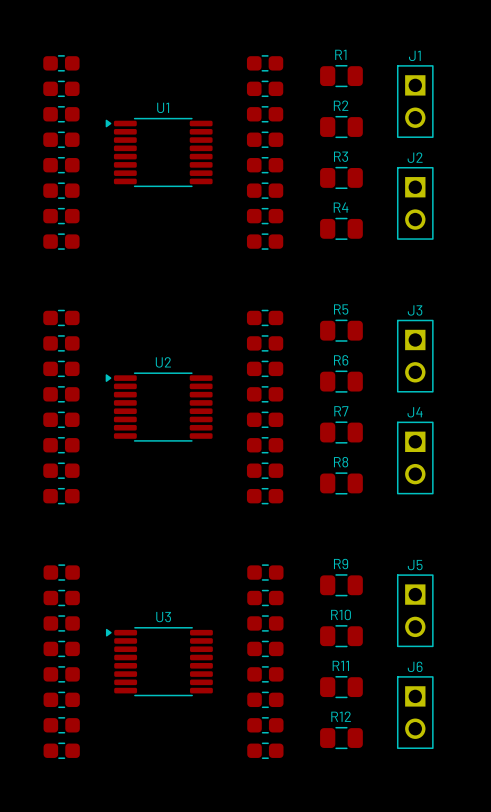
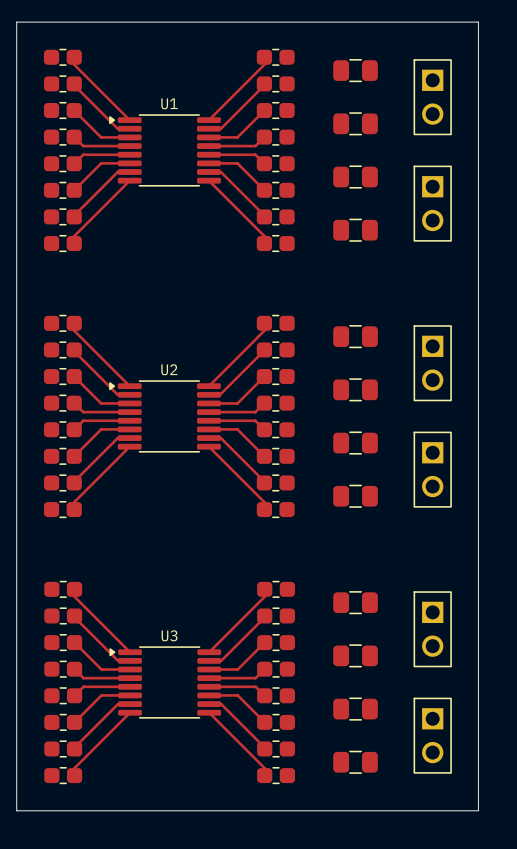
board edge: none -> (16, 22) (478, 22) (478, 810) (16, 810) (16, 22)
R1 name: R1 (340, 54) -> none
J1 name: J1 (414, 55) -> none
top track: none -> (74, 57) (74, 64) (129, 120)
top track: none -> (264, 57) (264, 64) (208, 120)
top track: none -> (74, 83) (117, 128) (129, 128)
top track: none -> (264, 83) (220, 128) (208, 128)
R2 name: R2 (341, 105) -> none
top track: none -> (74, 110) (101, 137) (129, 137)
top track: none -> (264, 110) (237, 137) (208, 137)
top track: none -> (74, 137) (83, 146) (129, 146)
top track: none -> (264, 137) (255, 146) (208, 146)
top track: none -> (129, 154) (83, 154) (74, 163)
top track: none -> (208, 154) (255, 154) (264, 163)
R3 name: R3 (341, 156) -> none
J2 name: J2 (415, 157) -> none
top track: none -> (129, 163) (101, 163) (74, 190)
top track: none -> (208, 163) (237, 163) (264, 190)
top track: none -> (129, 172) (117, 172) (74, 216)
top track: none -> (208, 172) (220, 172) (264, 216)
top track: none -> (129, 180) (74, 236) (74, 243)
top track: none -> (208, 180) (264, 236) (264, 243)
R4 name: R4 (341, 207) -> none
R5 name: R5 (341, 309) -> none
J3 name: J3 (415, 310) -> none
top track: none -> (74, 323) (74, 330) (129, 386)
top track: none -> (264, 323) (264, 330) (208, 386)
top track: none -> (74, 349) (117, 394) (129, 394)
top track: none -> (264, 349) (220, 394) (208, 394)
R6 name: R6 (341, 360) -> none
top track: none -> (74, 376) (101, 403) (129, 403)
top track: none -> (264, 376) (237, 403) (208, 403)
top track: none -> (74, 403) (83, 412) (129, 412)
top track: none -> (264, 403) (255, 412) (208, 412)
top track: none -> (129, 420) (83, 420) (74, 429)
top track: none -> (208, 420) (255, 420) (264, 429)
R7 name: R7 (341, 411) -> none
J4 name: J4 (415, 412) -> none
top track: none -> (129, 429) (101, 429) (74, 456)
top track: none -> (208, 429) (237, 429) (264, 456)
top track: none -> (129, 438) (117, 438) (74, 482)
top track: none -> (208, 438) (220, 438) (264, 482)
top track: none -> (129, 446) (74, 502) (74, 509)
top track: none -> (208, 446) (264, 502) (264, 509)
R8 name: R8 (341, 462) -> none
R9 name: R9 (341, 564) -> none
J5 name: J5 (415, 565) -> none
top track: none -> (74, 589) (74, 596) (130, 652)
top track: none -> (264, 589) (264, 596) (209, 652)
top track: none -> (74, 615) (118, 660) (130, 660)
top track: none -> (264, 615) (221, 660) (209, 660)
R10 name: R10 (341, 614) -> none
top track: none -> (74, 642) (101, 669) (130, 669)
top track: none -> (264, 642) (237, 669) (209, 669)
top track: none -> (74, 669) (83, 678) (130, 678)
top track: none -> (264, 669) (255, 678) (209, 678)
top track: none -> (130, 686) (83, 686) (74, 695)
top track: none -> (209, 686) (255, 686) (264, 695)
R11 name: R11 (340, 665) -> none
J6 name: J6 (415, 666) -> none
top track: none -> (130, 695) (101, 695) (74, 722)
top track: none -> (209, 695) (237, 695) (264, 722)
top track: none -> (130, 704) (118, 704) (74, 748)
top track: none -> (209, 704) (221, 704) (264, 748)
top track: none -> (130, 712) (74, 768) (74, 775)
top track: none -> (209, 712) (264, 768) (264, 775)
R12 name: R12 (341, 716) -> none

